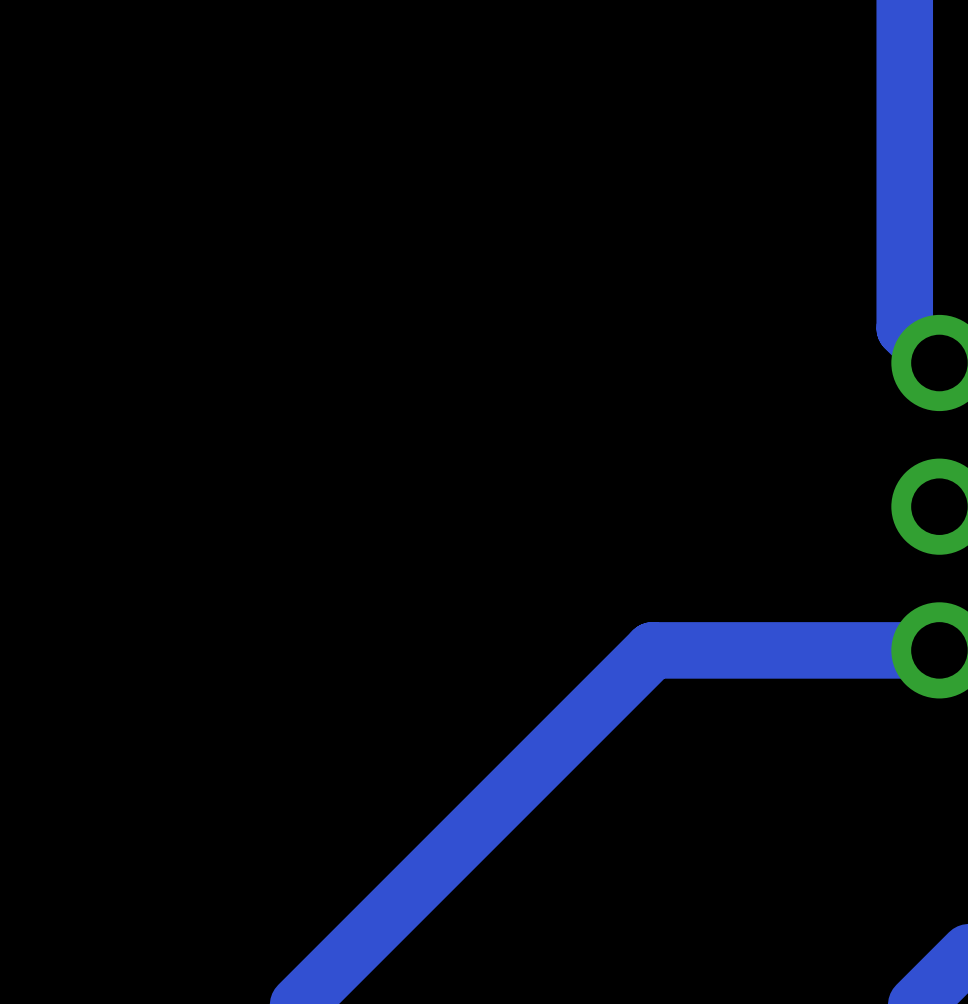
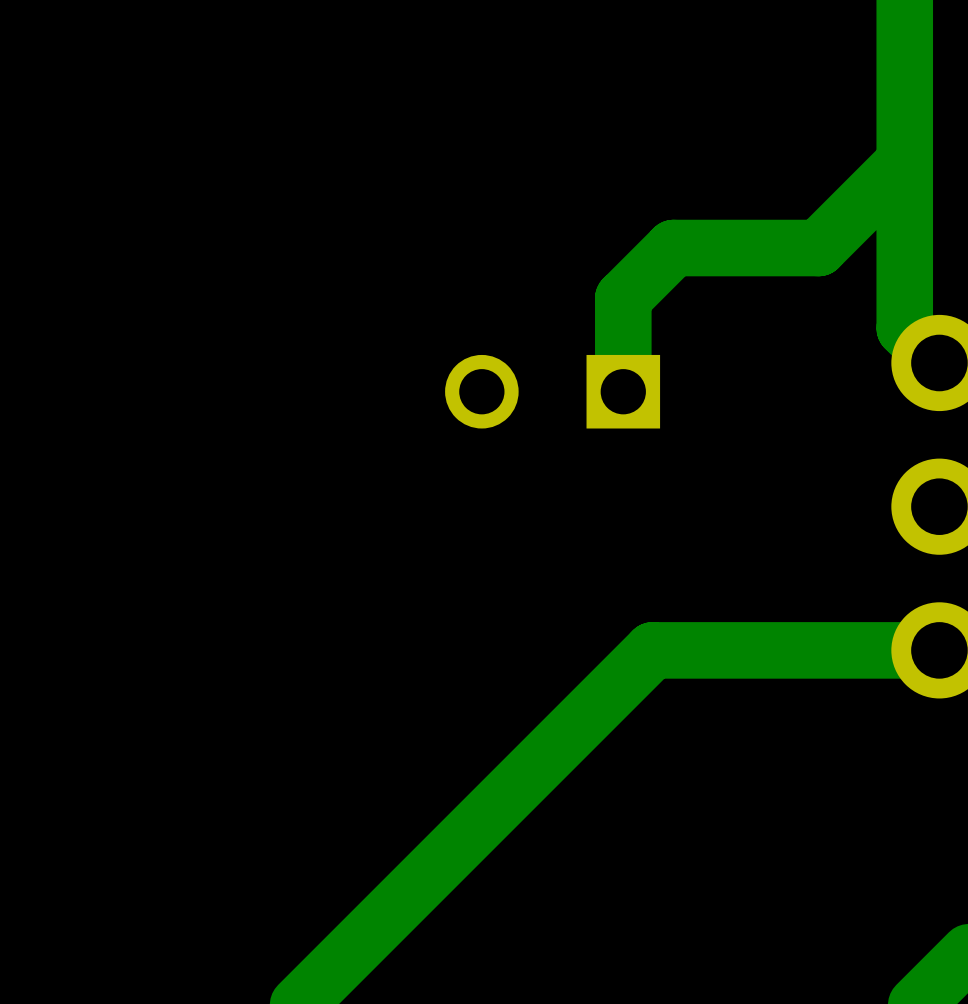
bottom track: none -> (904, 161) (818, 248) (673, 248) (623, 298) (623, 391)
part: none -> (552, 391)

